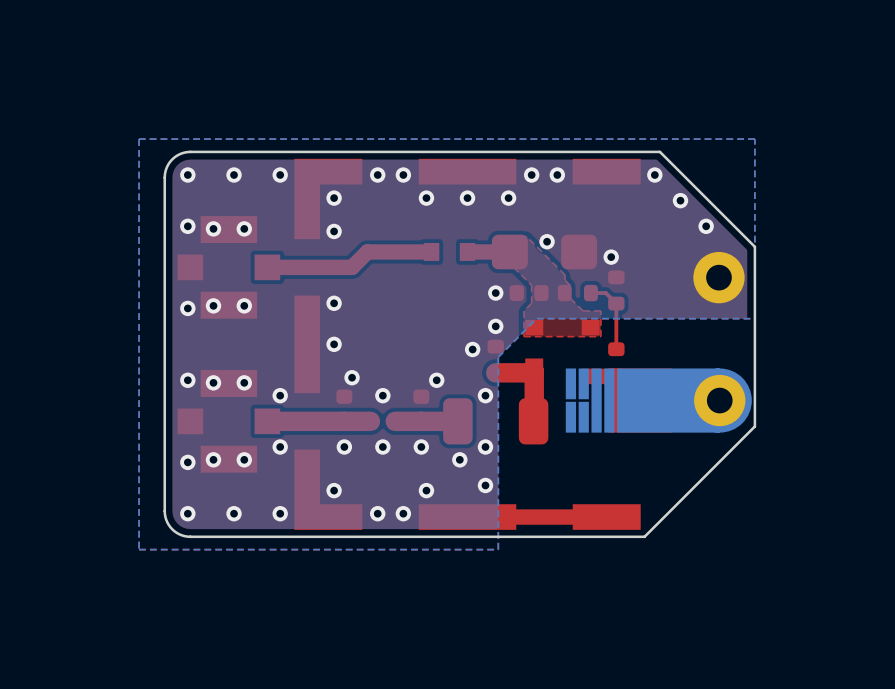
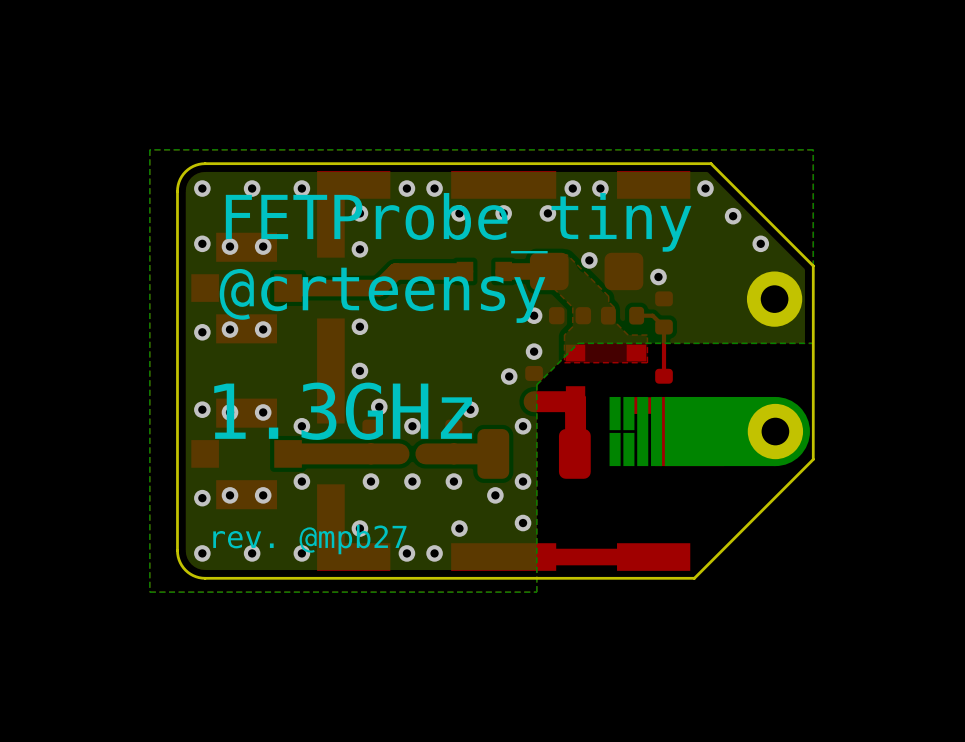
text: none -> FETProbe_tiny (458, 223)
text: none -> @crteensy (382, 295)
text: none -> 1.3GHz (343, 411)
text: none -> rev. @mpb27 (309, 539)

